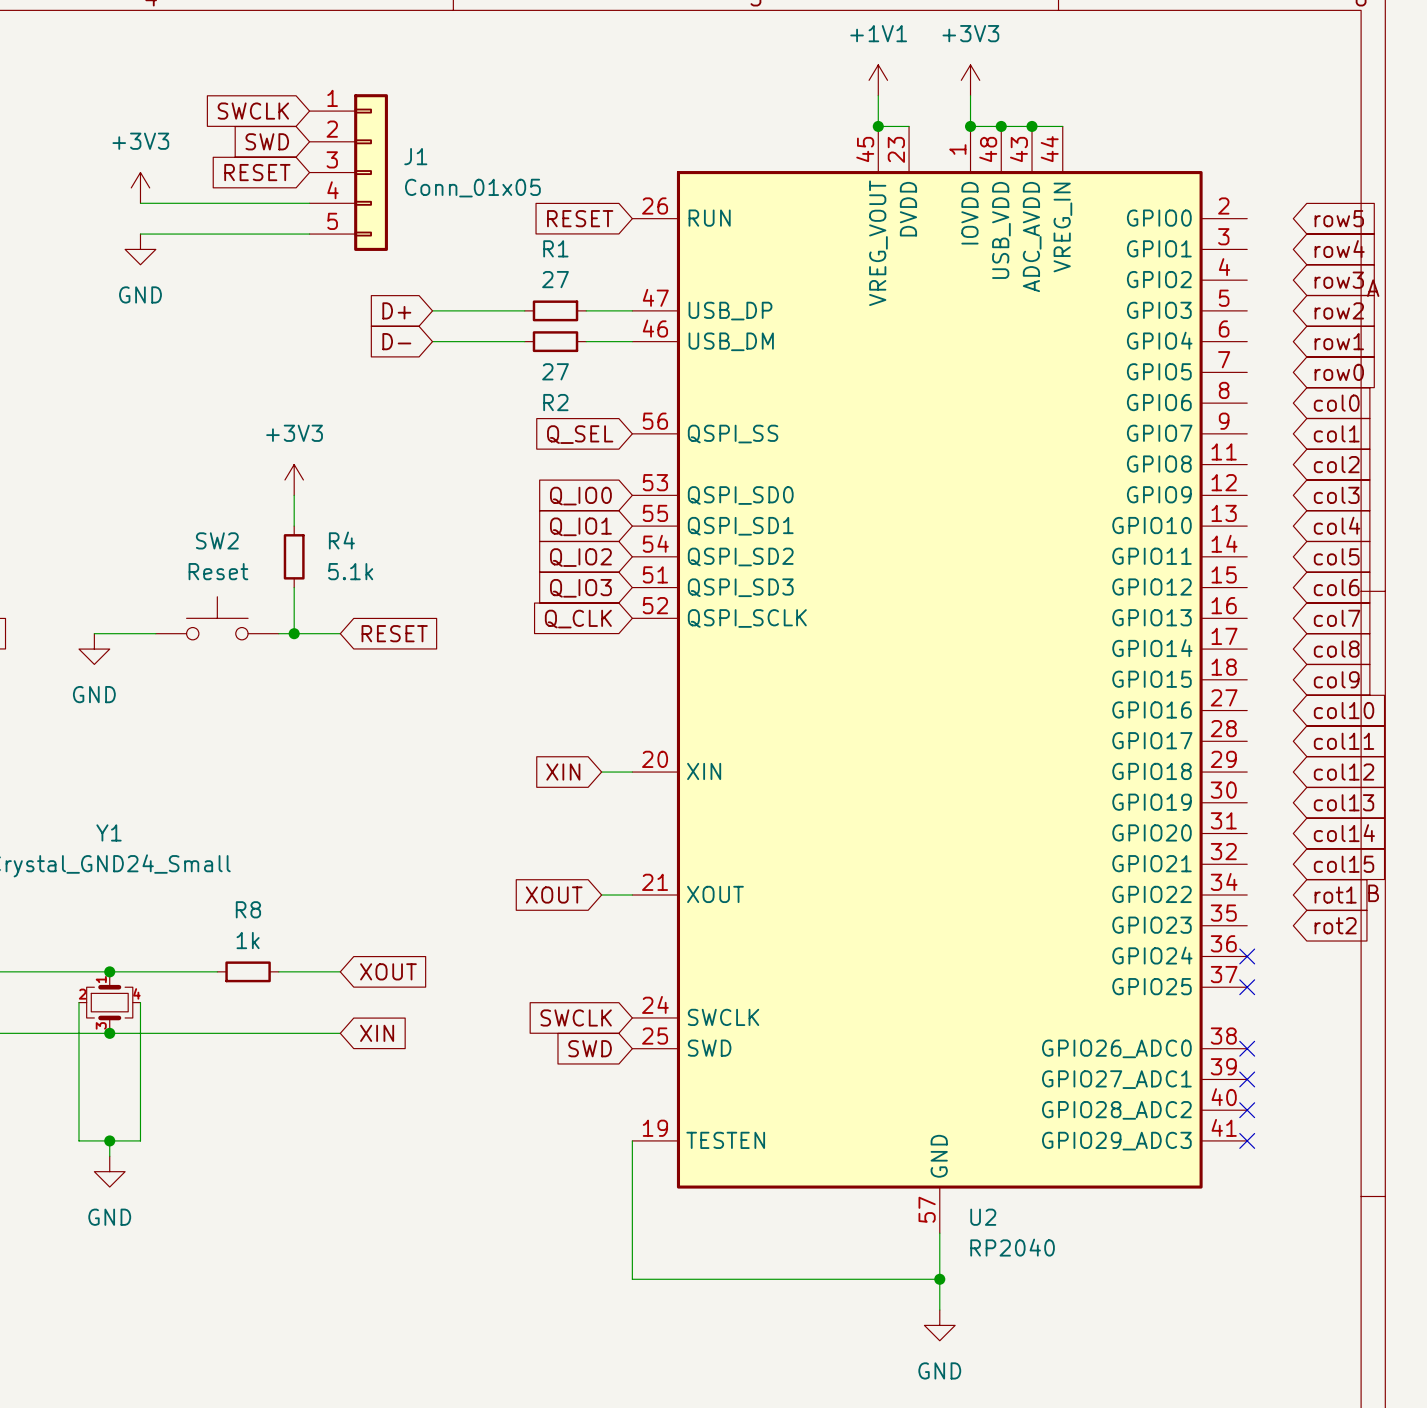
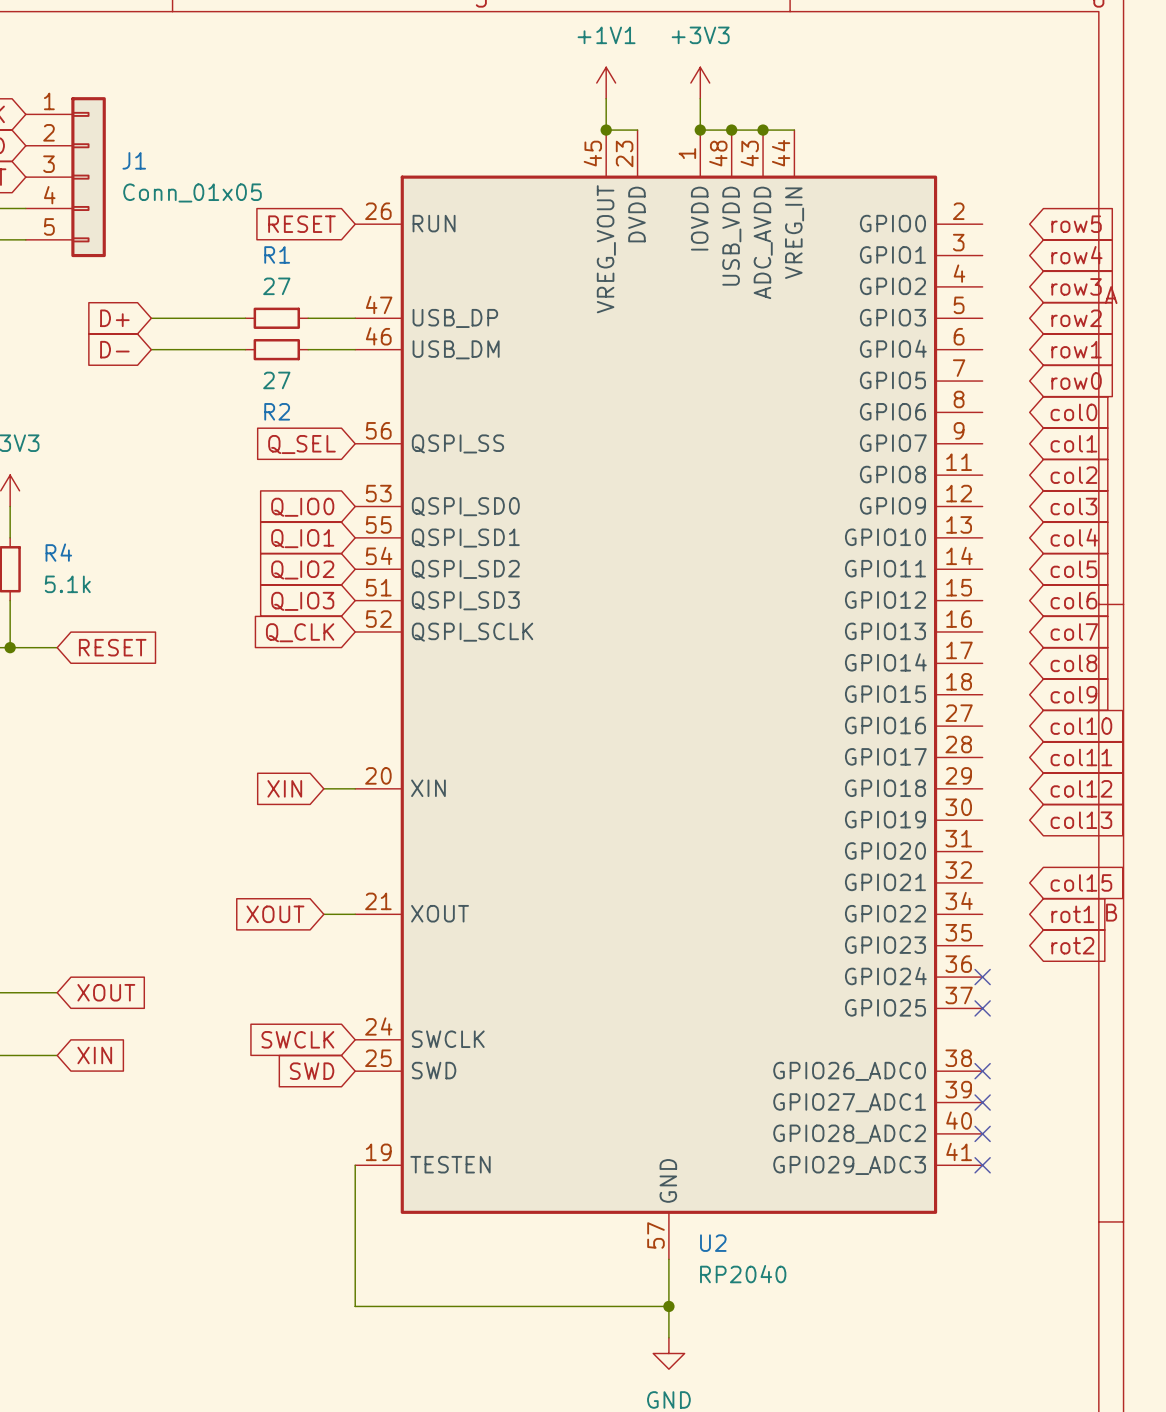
global label: col14 (1344, 833) -> none

